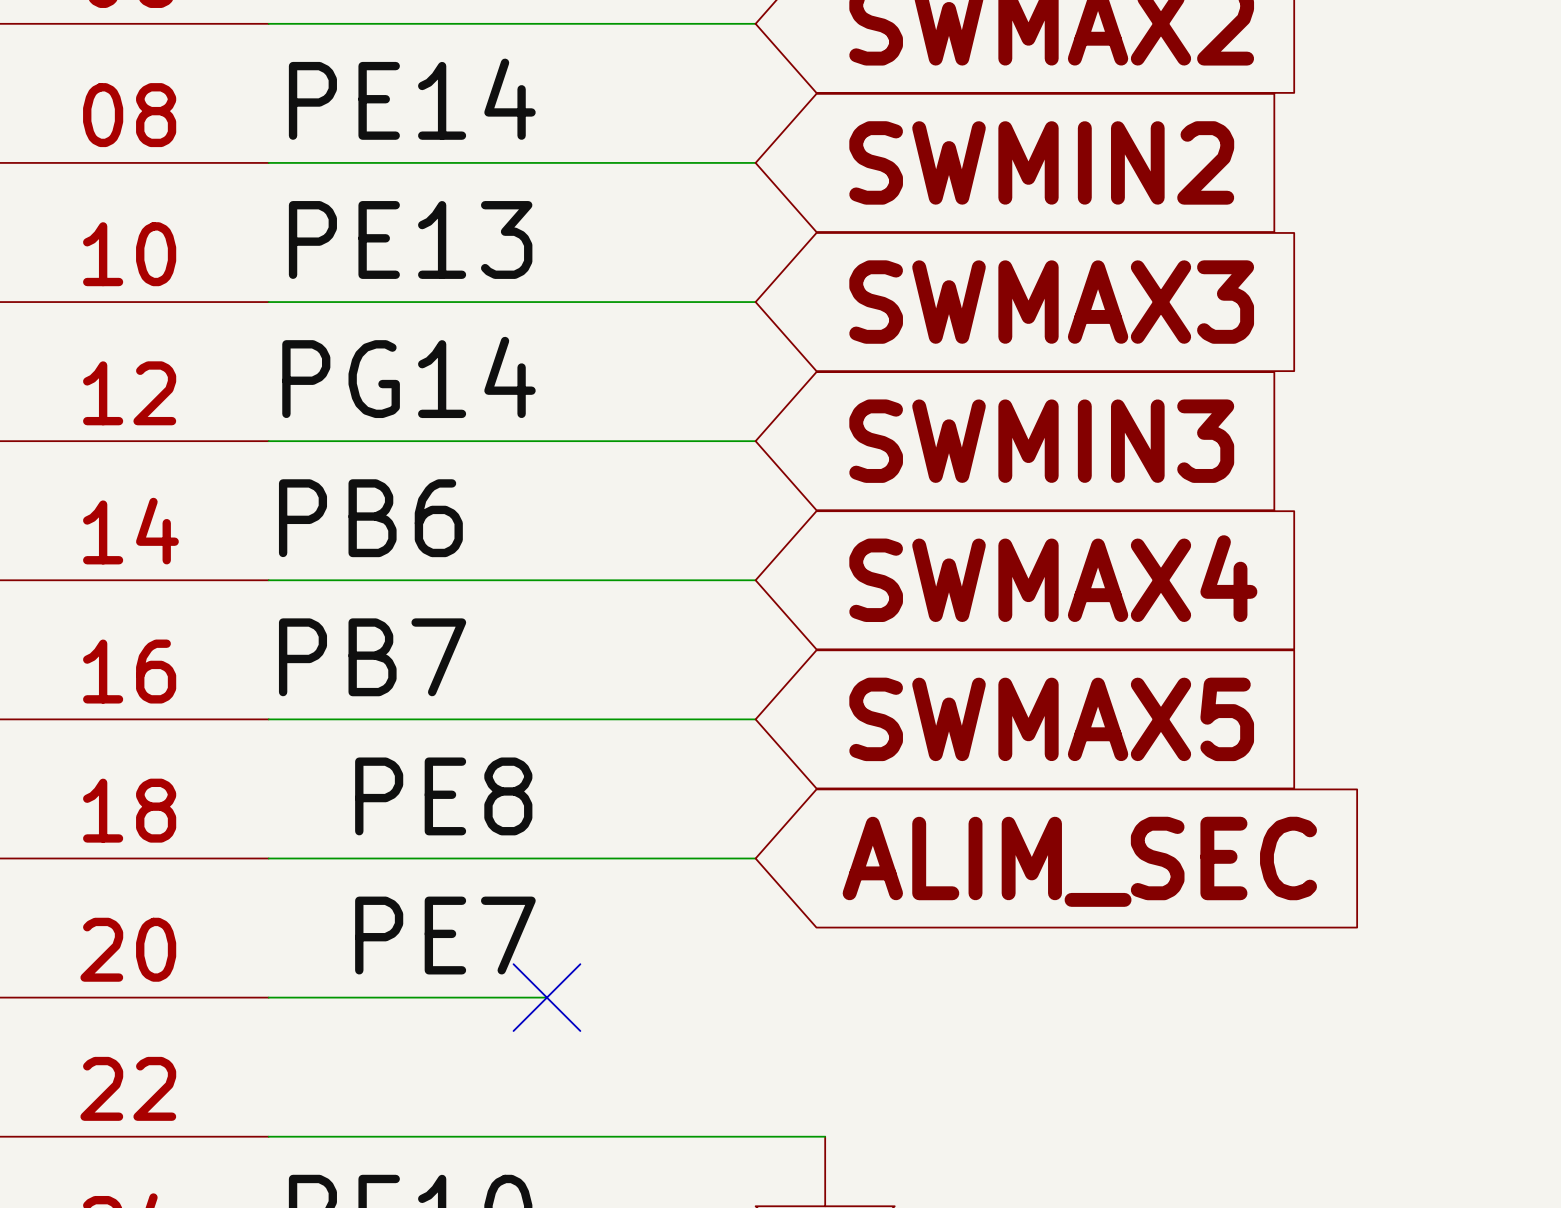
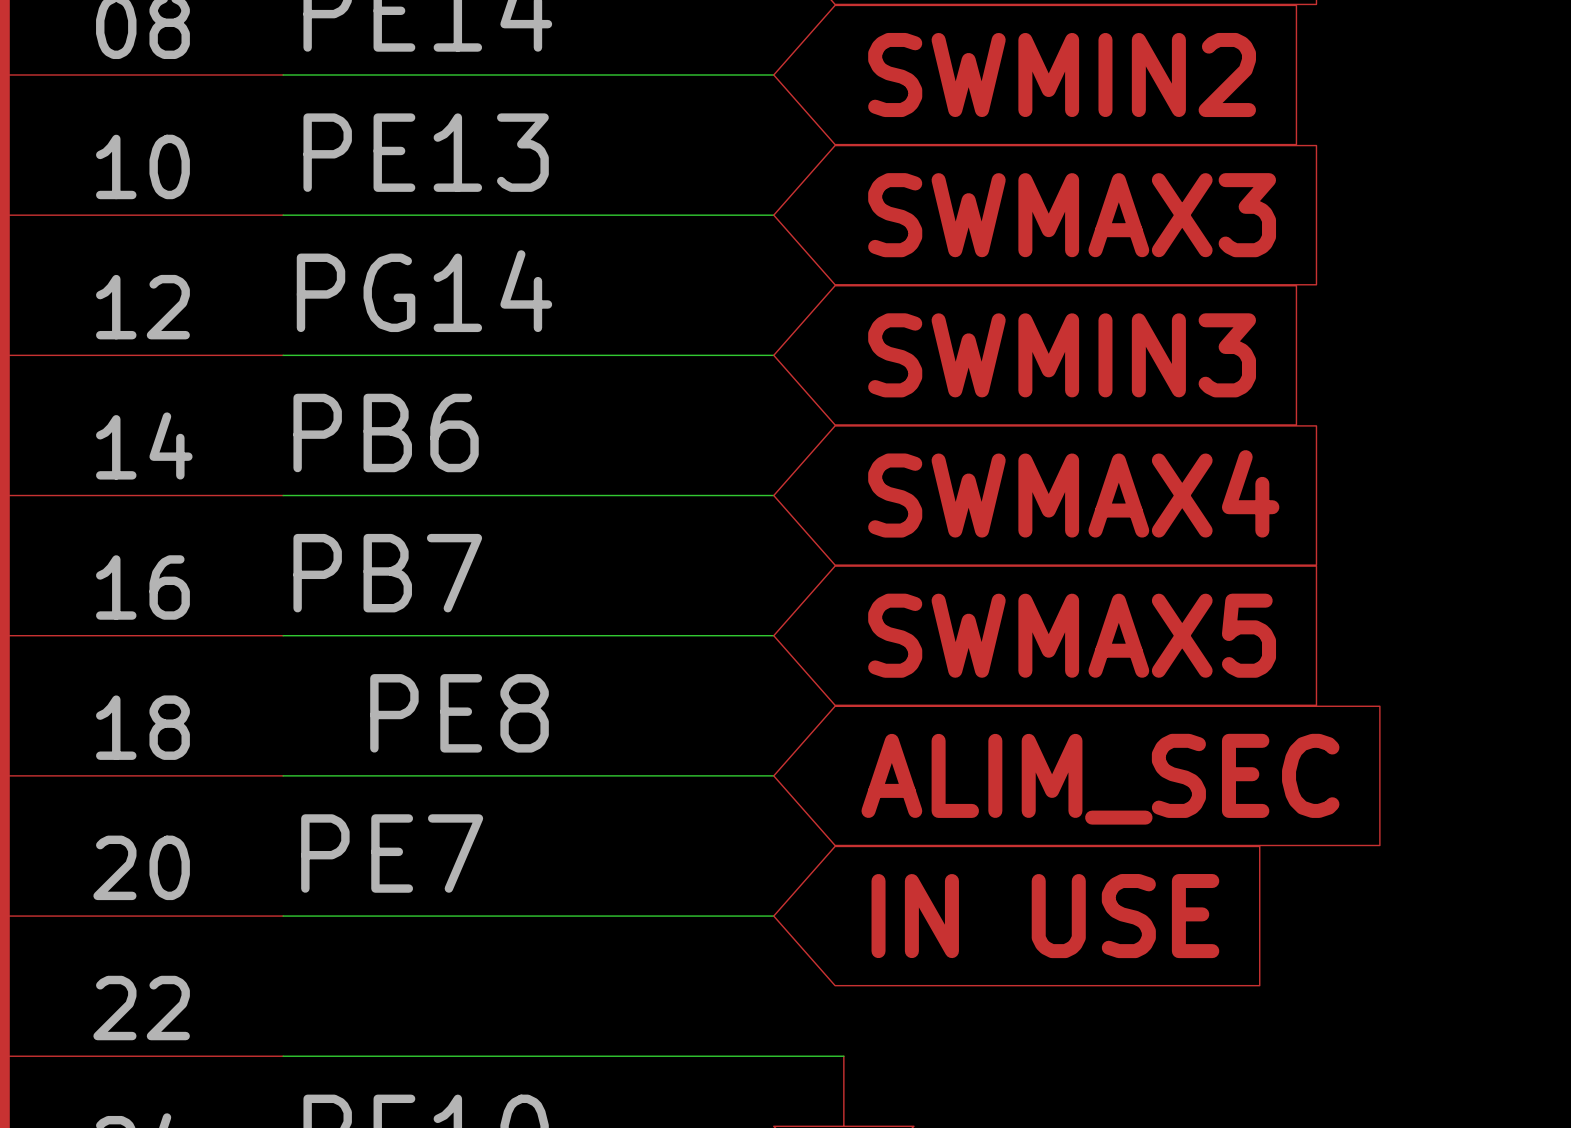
label position: PE7 (445, 935) -> PE7 (392, 853)
wire: none -> (563, 916) (773, 916)
no-connect mark: (546, 997) -> none
global label: none -> IN USE (1045, 916)

